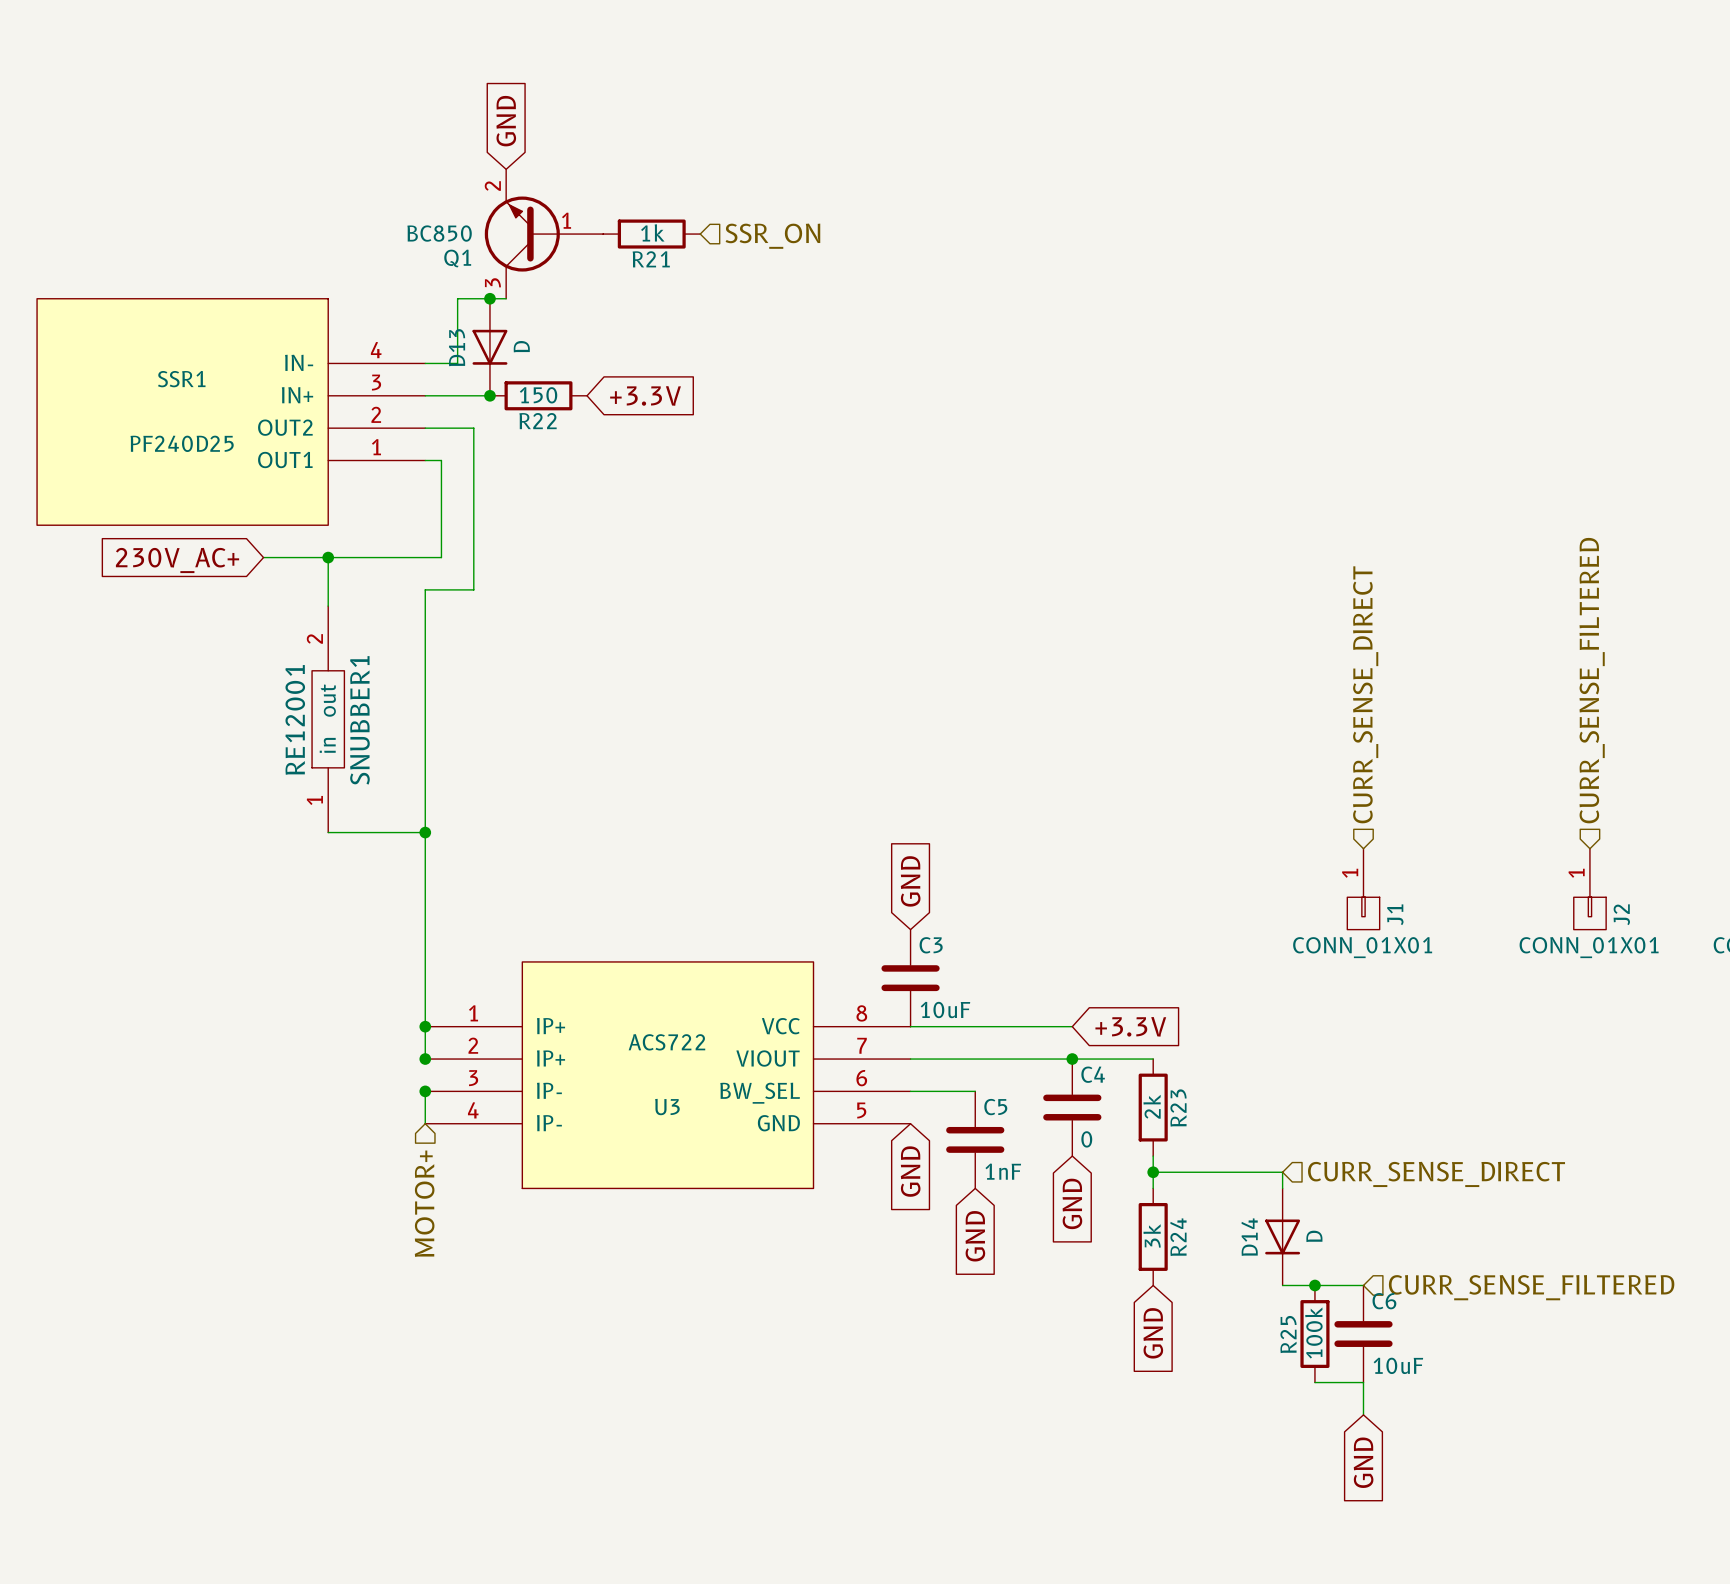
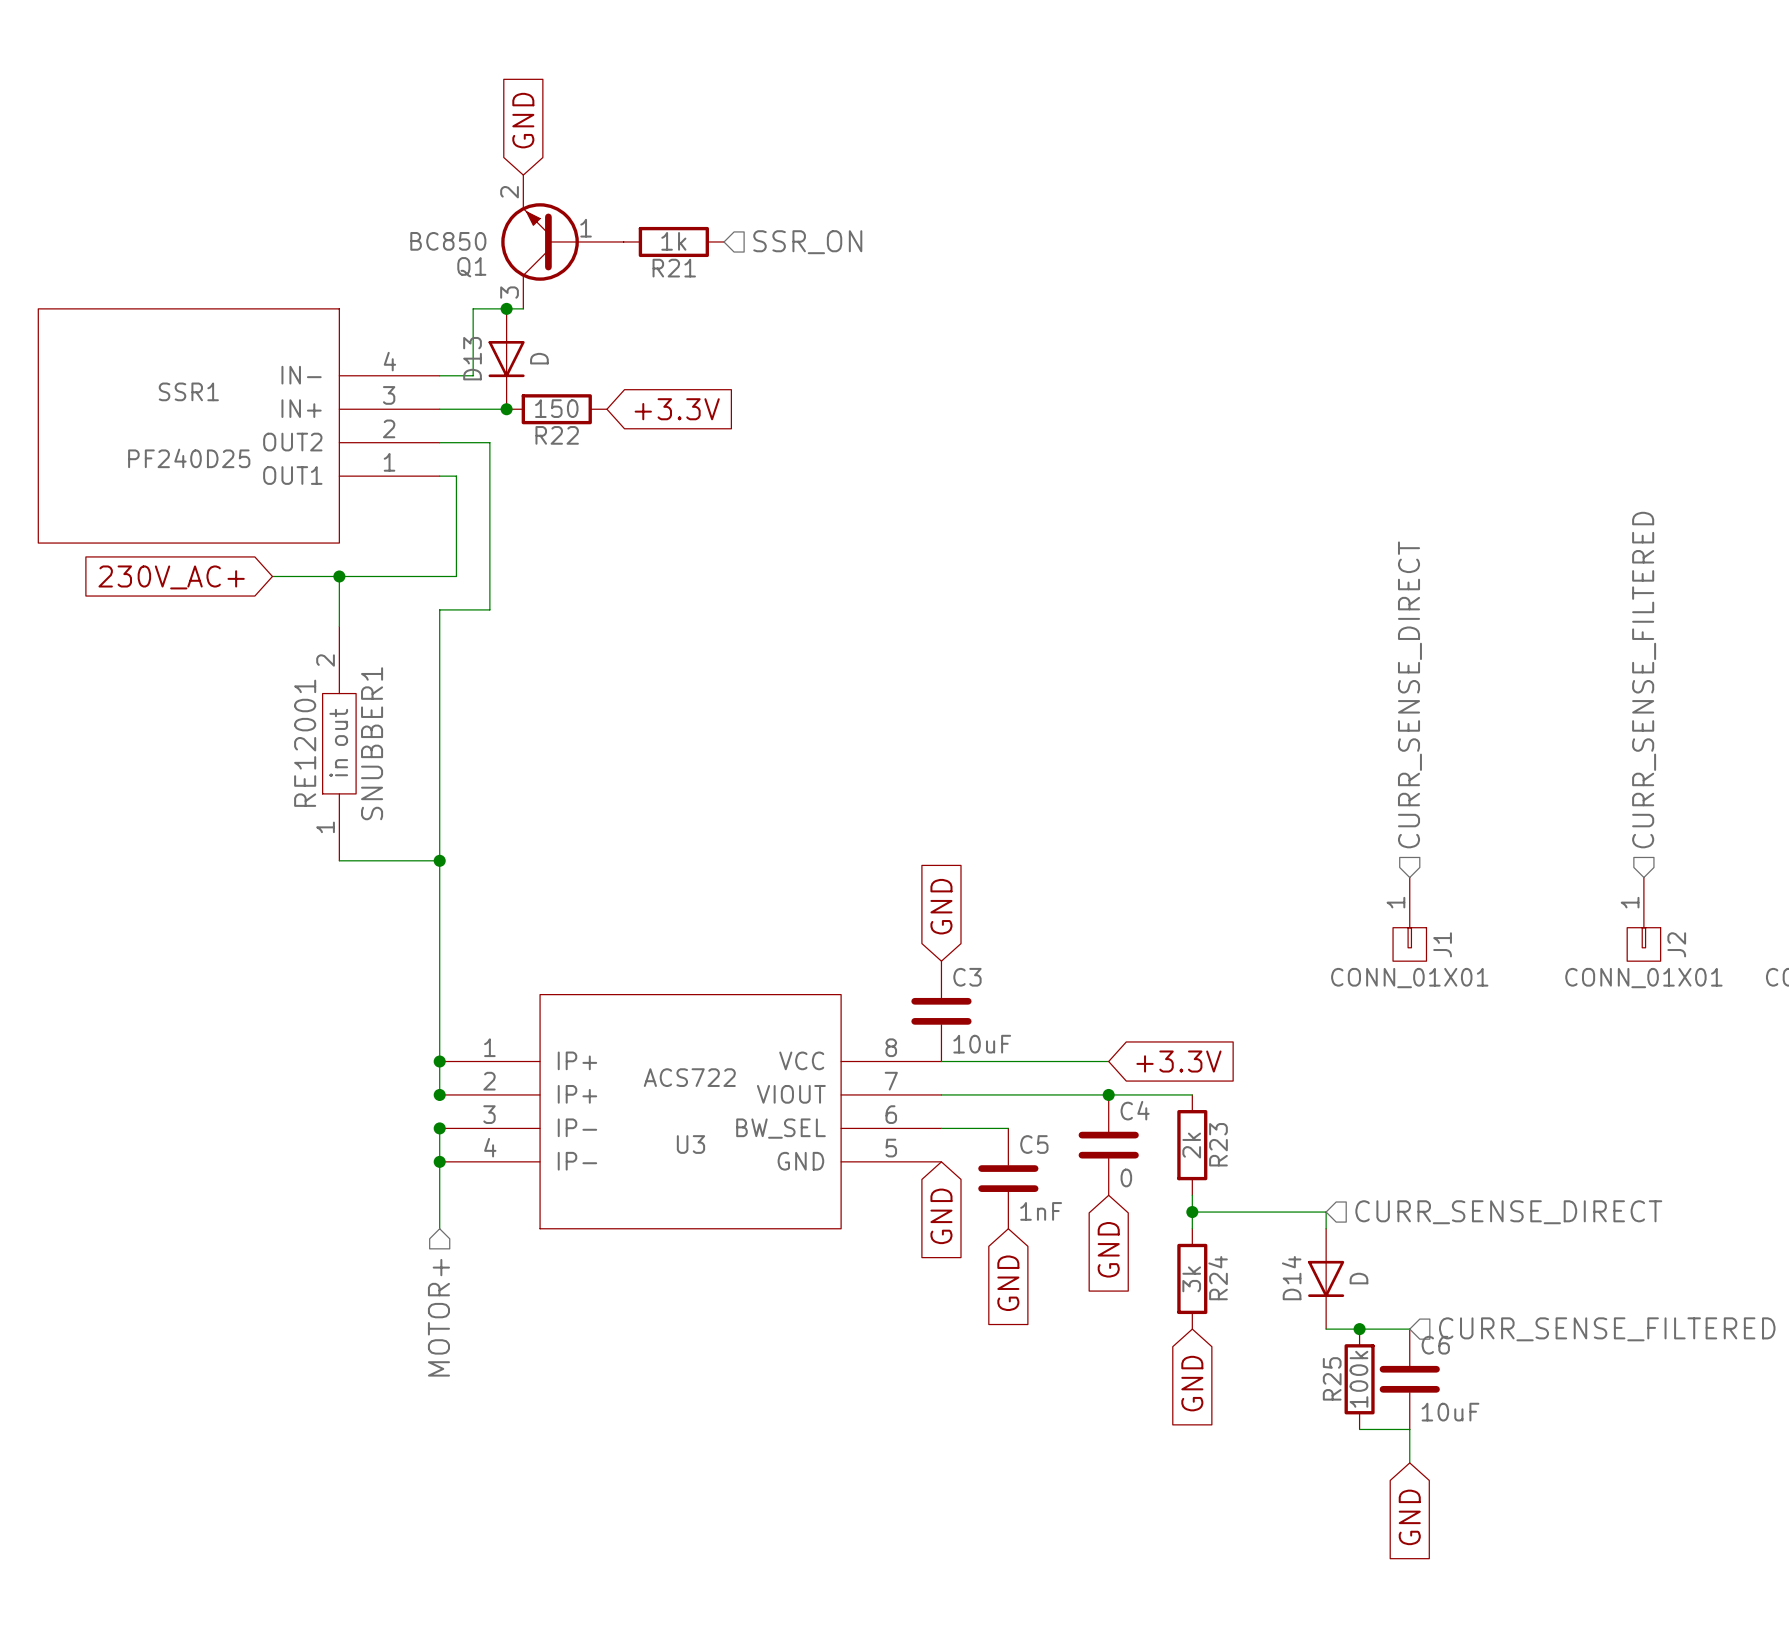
wire: none -> (439, 1161) (439, 1228)
junction: none -> (439, 1161)
hierarchical label position: MOTOR+ (424, 1203) -> MOTOR+ (438, 1317)

